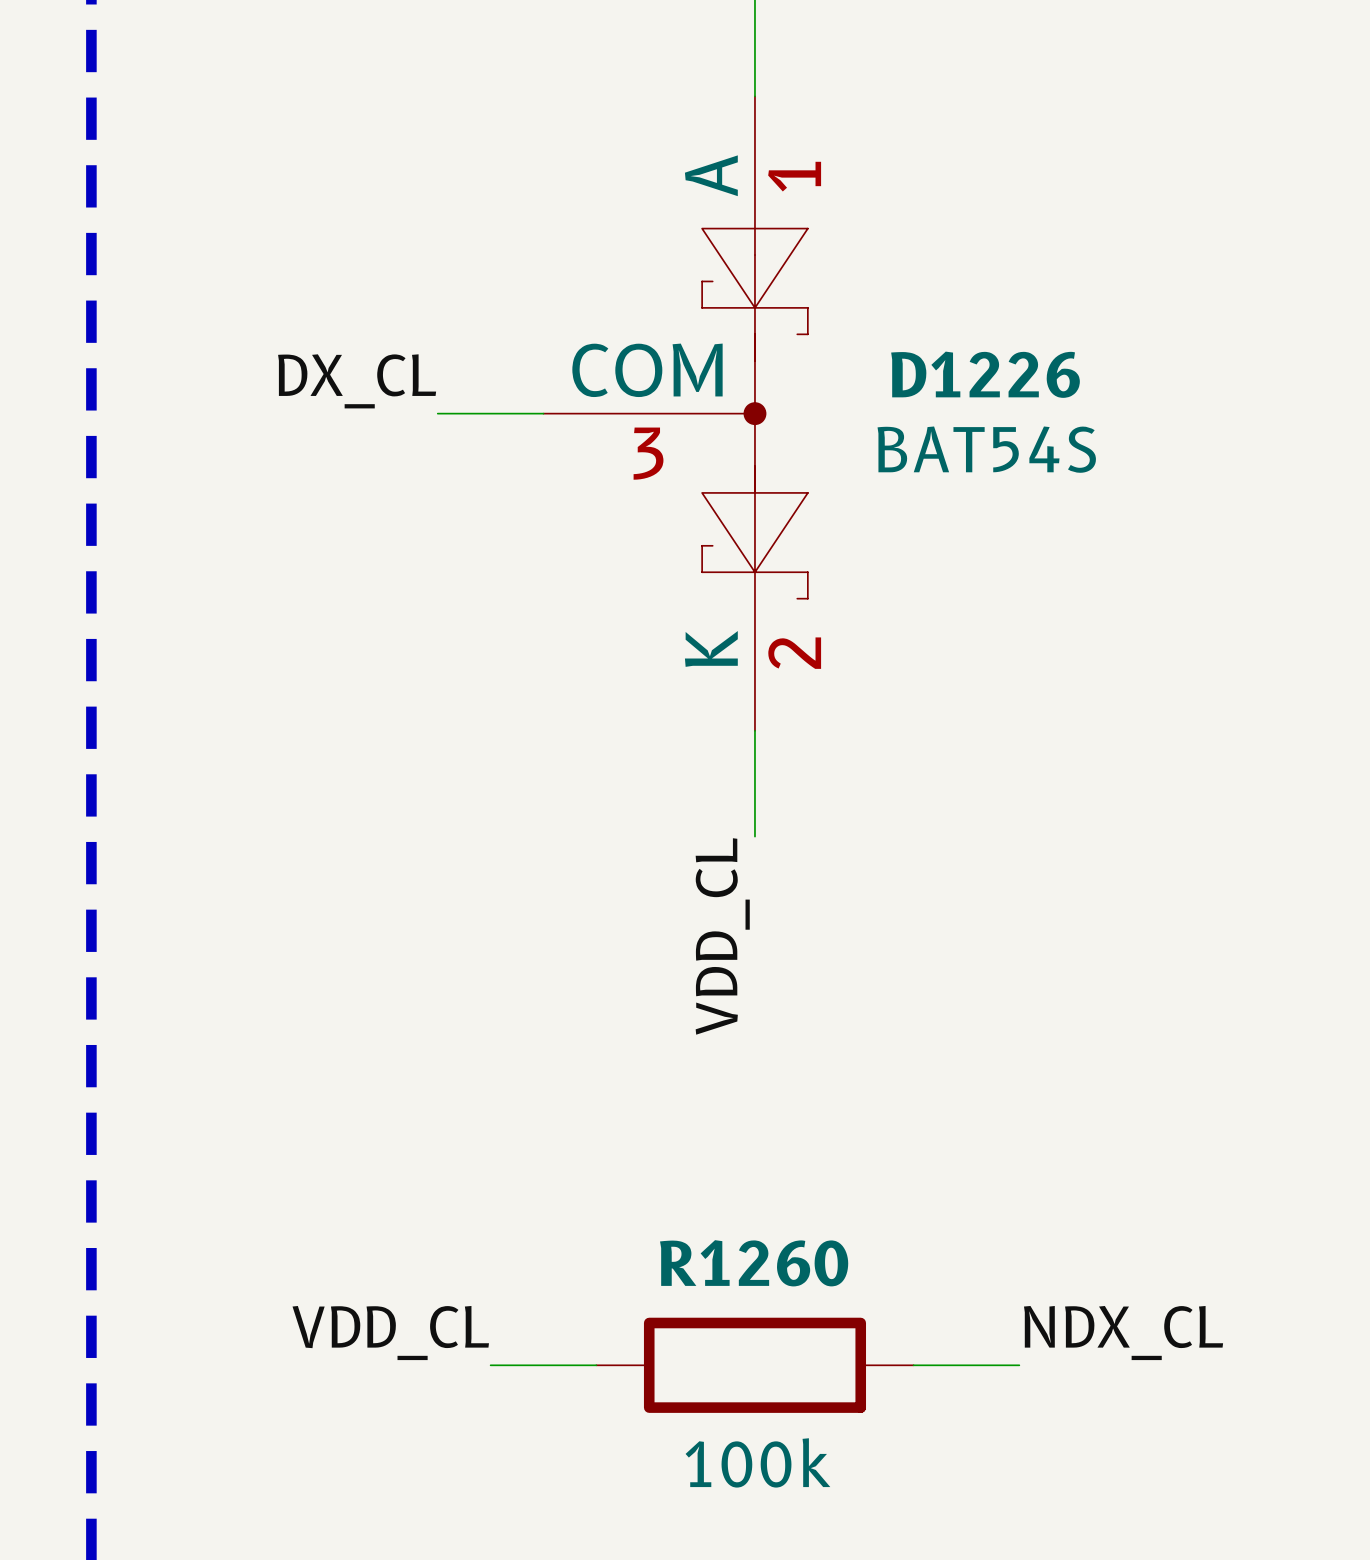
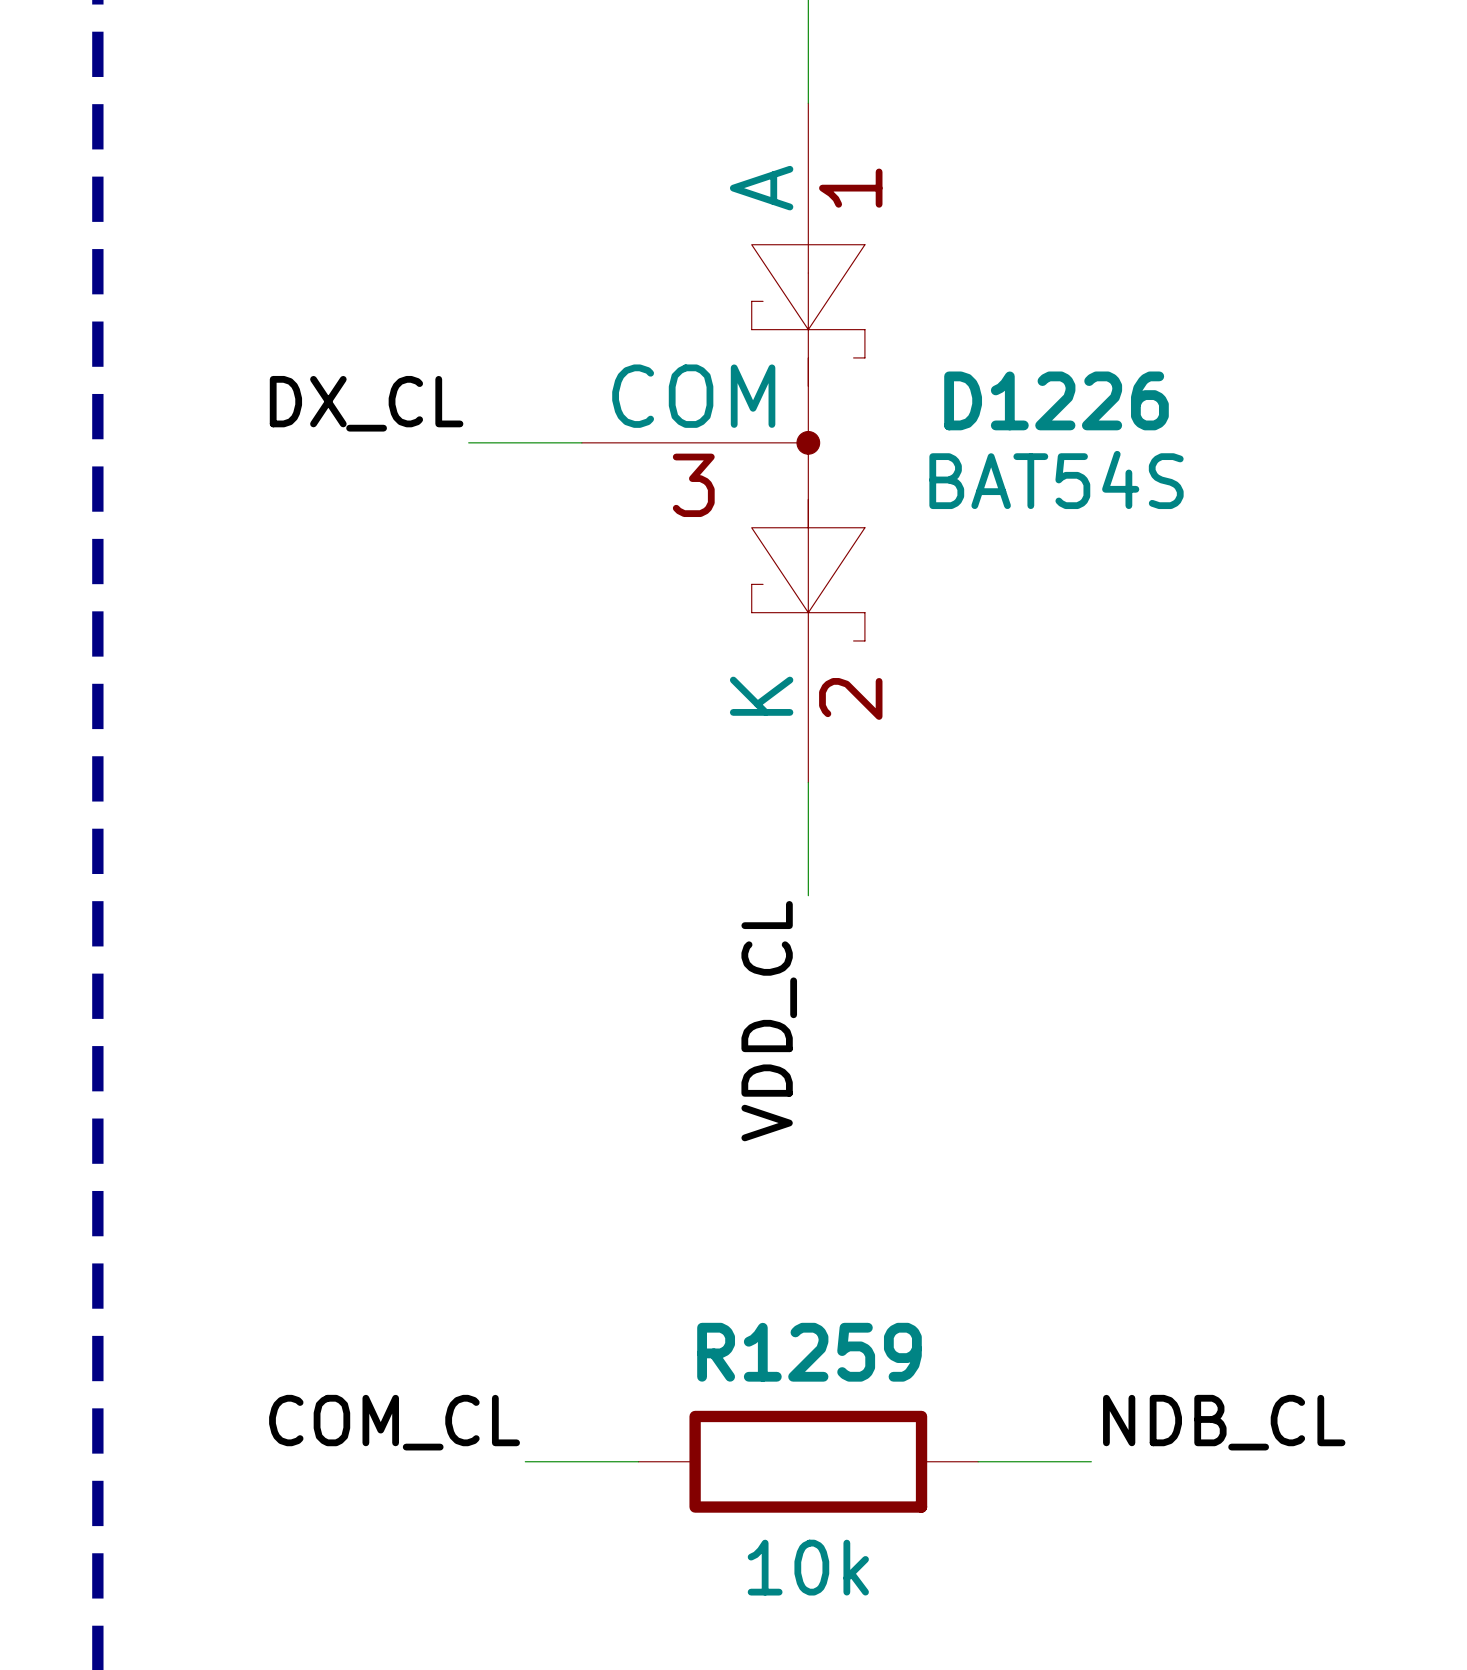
R1260 name: R1260 (754, 1263) -> R1259 (809, 1352)
label: VDD_CL (390, 1333) -> COM_CL (394, 1422)
label: NDX_CL (1123, 1333) -> NDB_CL (1224, 1422)
R1260 value: 100k (757, 1462) -> 10k (808, 1567)

